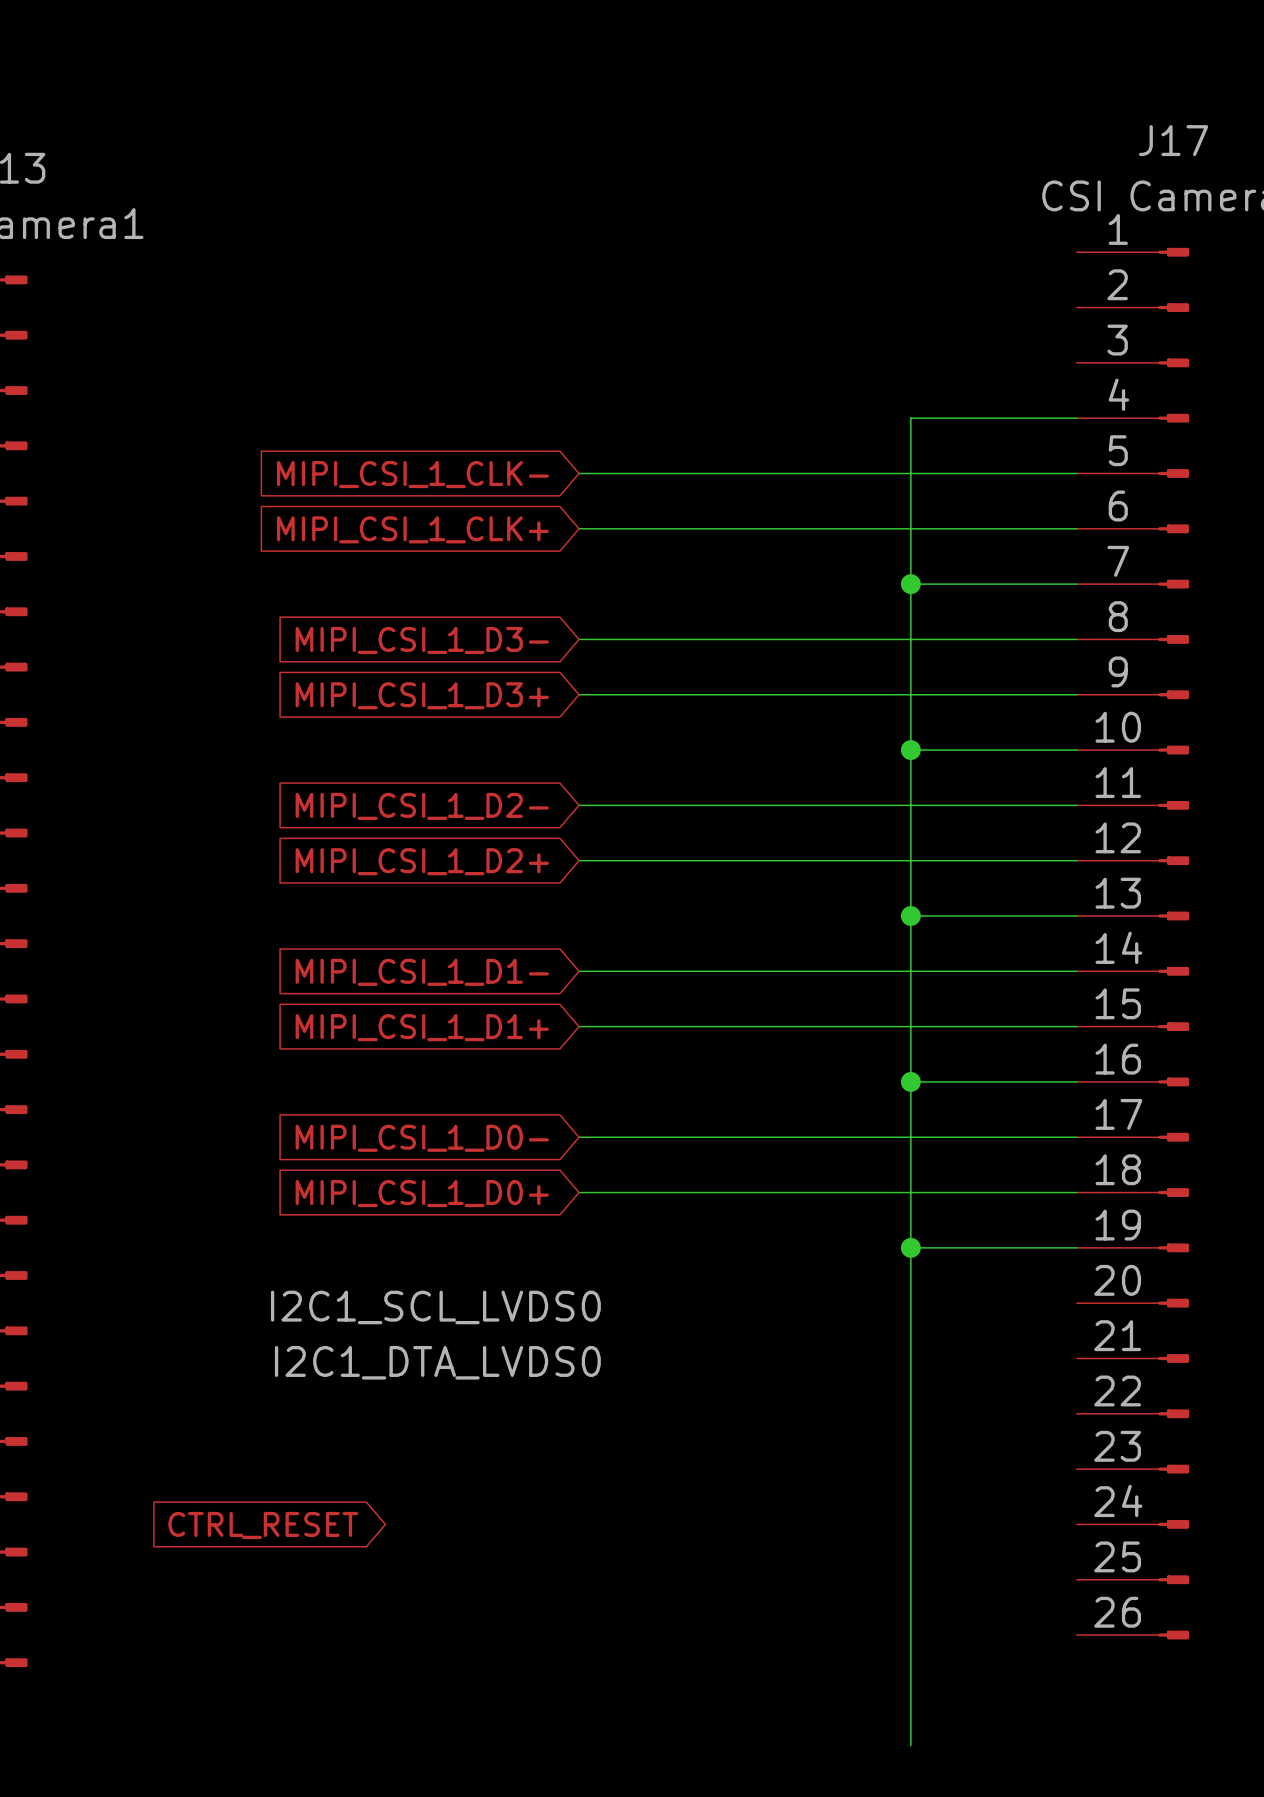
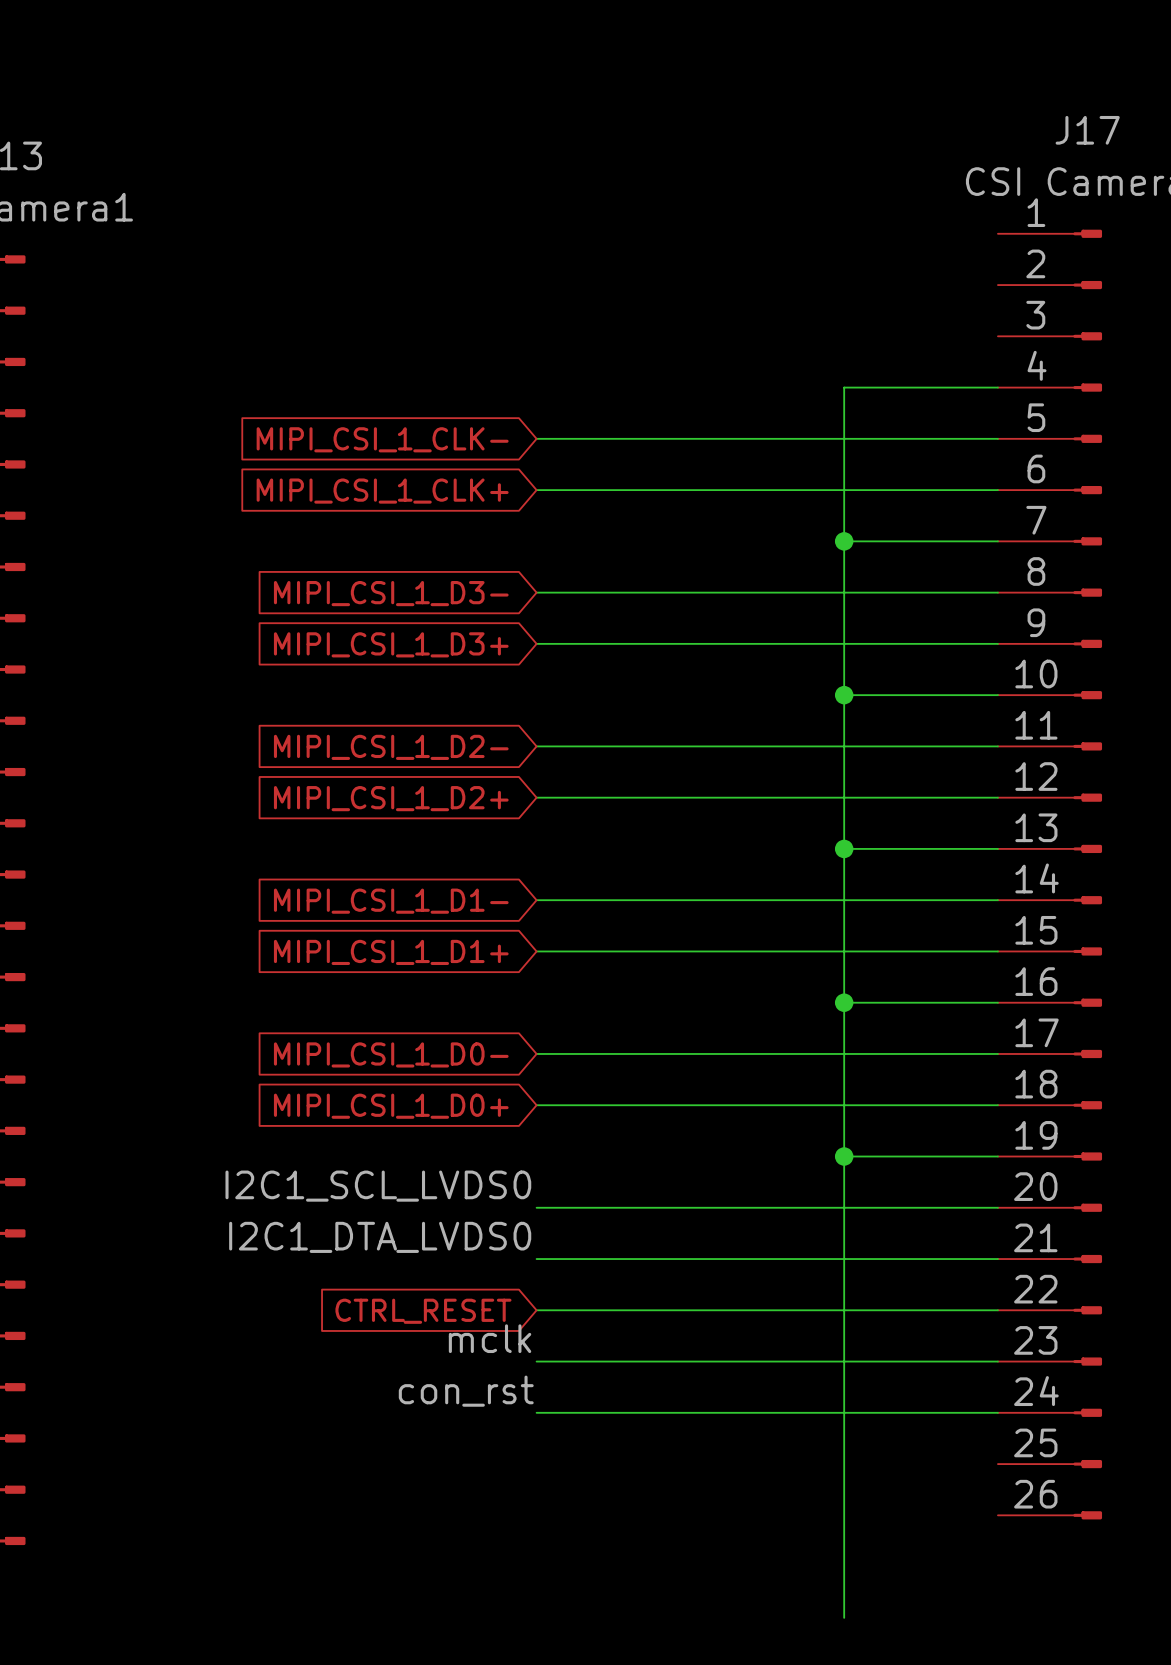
wire: none -> (536, 1207) (997, 1207)
label position: I2C1_SCL_LVDS0 (435, 1307) -> I2C1_SCL_LVDS0 (378, 1186)
wire: none -> (536, 1259) (997, 1259)
label position: I2C1_DTA_LVDS0 (437, 1362) -> I2C1_DTA_LVDS0 (380, 1237)
wire: none -> (536, 1310) (997, 1310)
label: none -> mclk (490, 1338)
wire: none -> (536, 1361) (997, 1361)
label: none -> con_rst (466, 1391)
wire: none -> (536, 1412) (997, 1412)
global label position: CTRL_RESET (263, 1525) -> CTRL_RESET (423, 1311)

